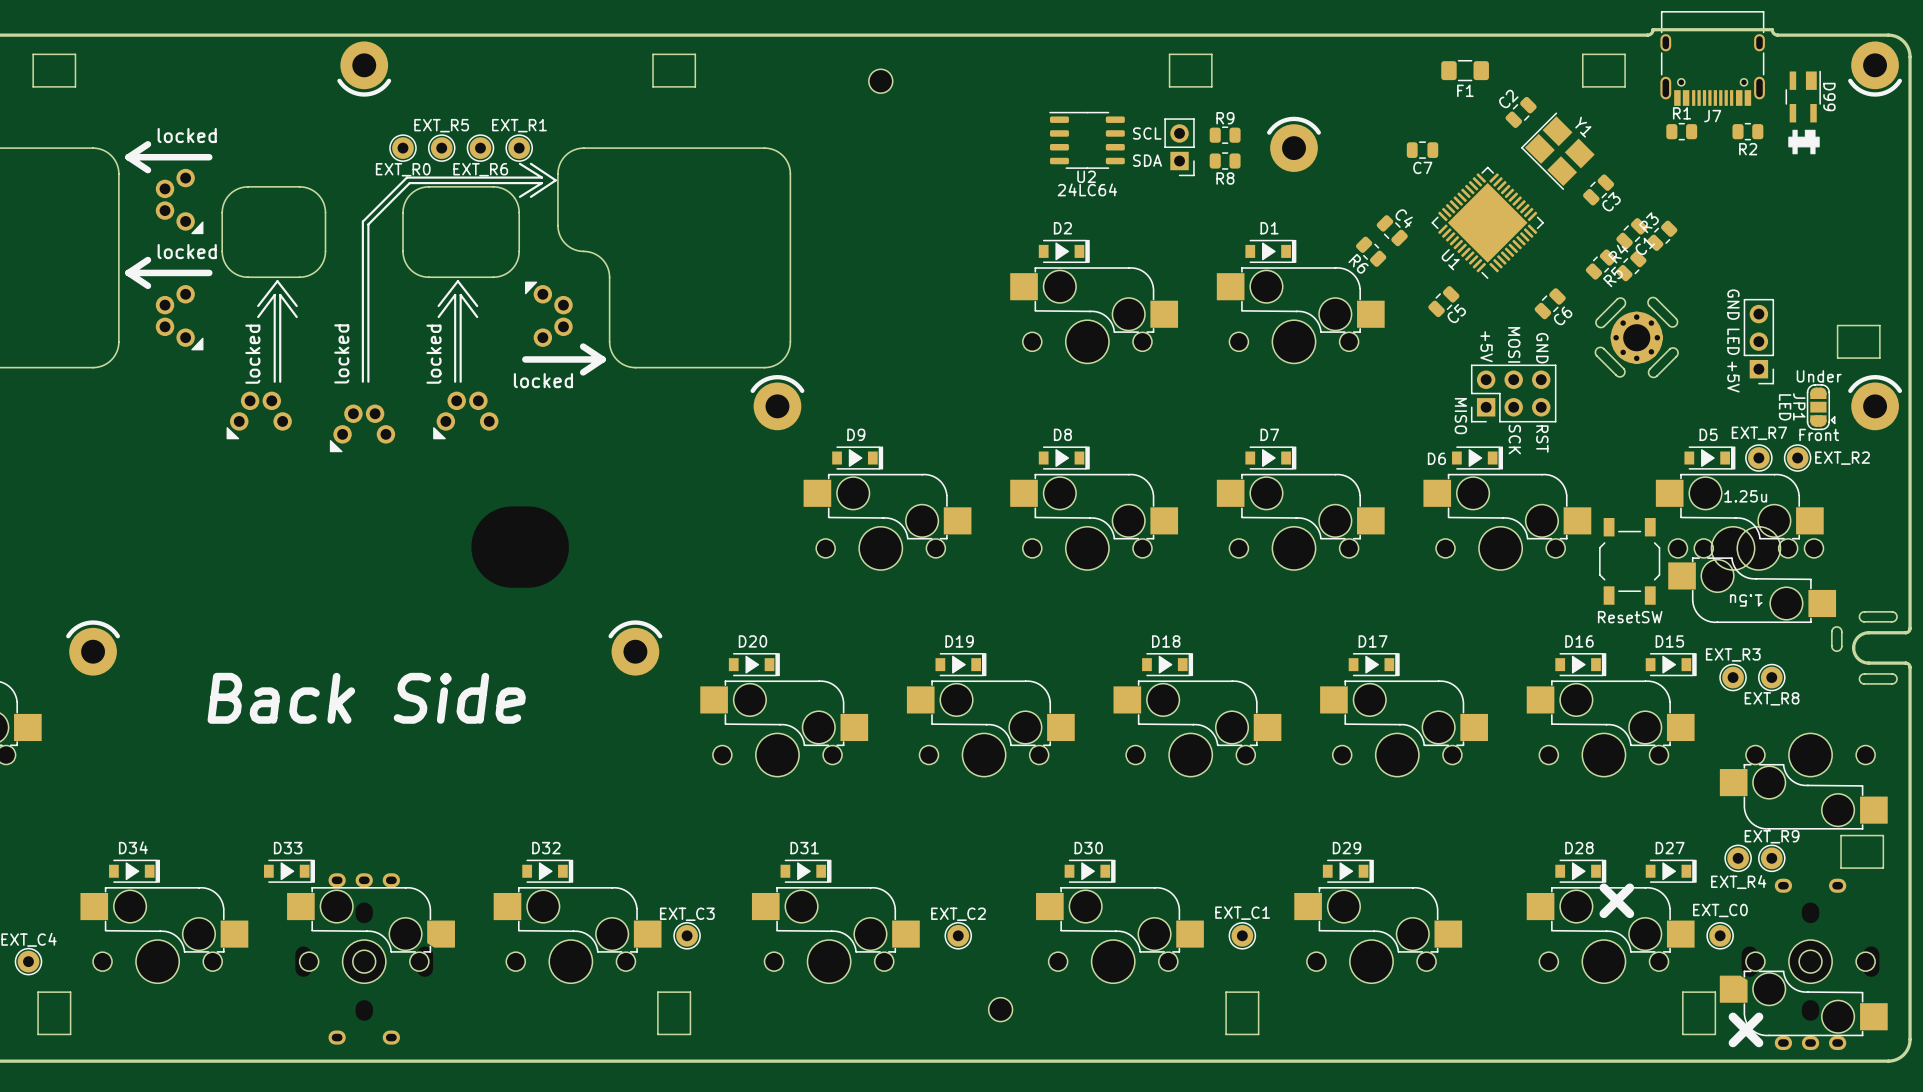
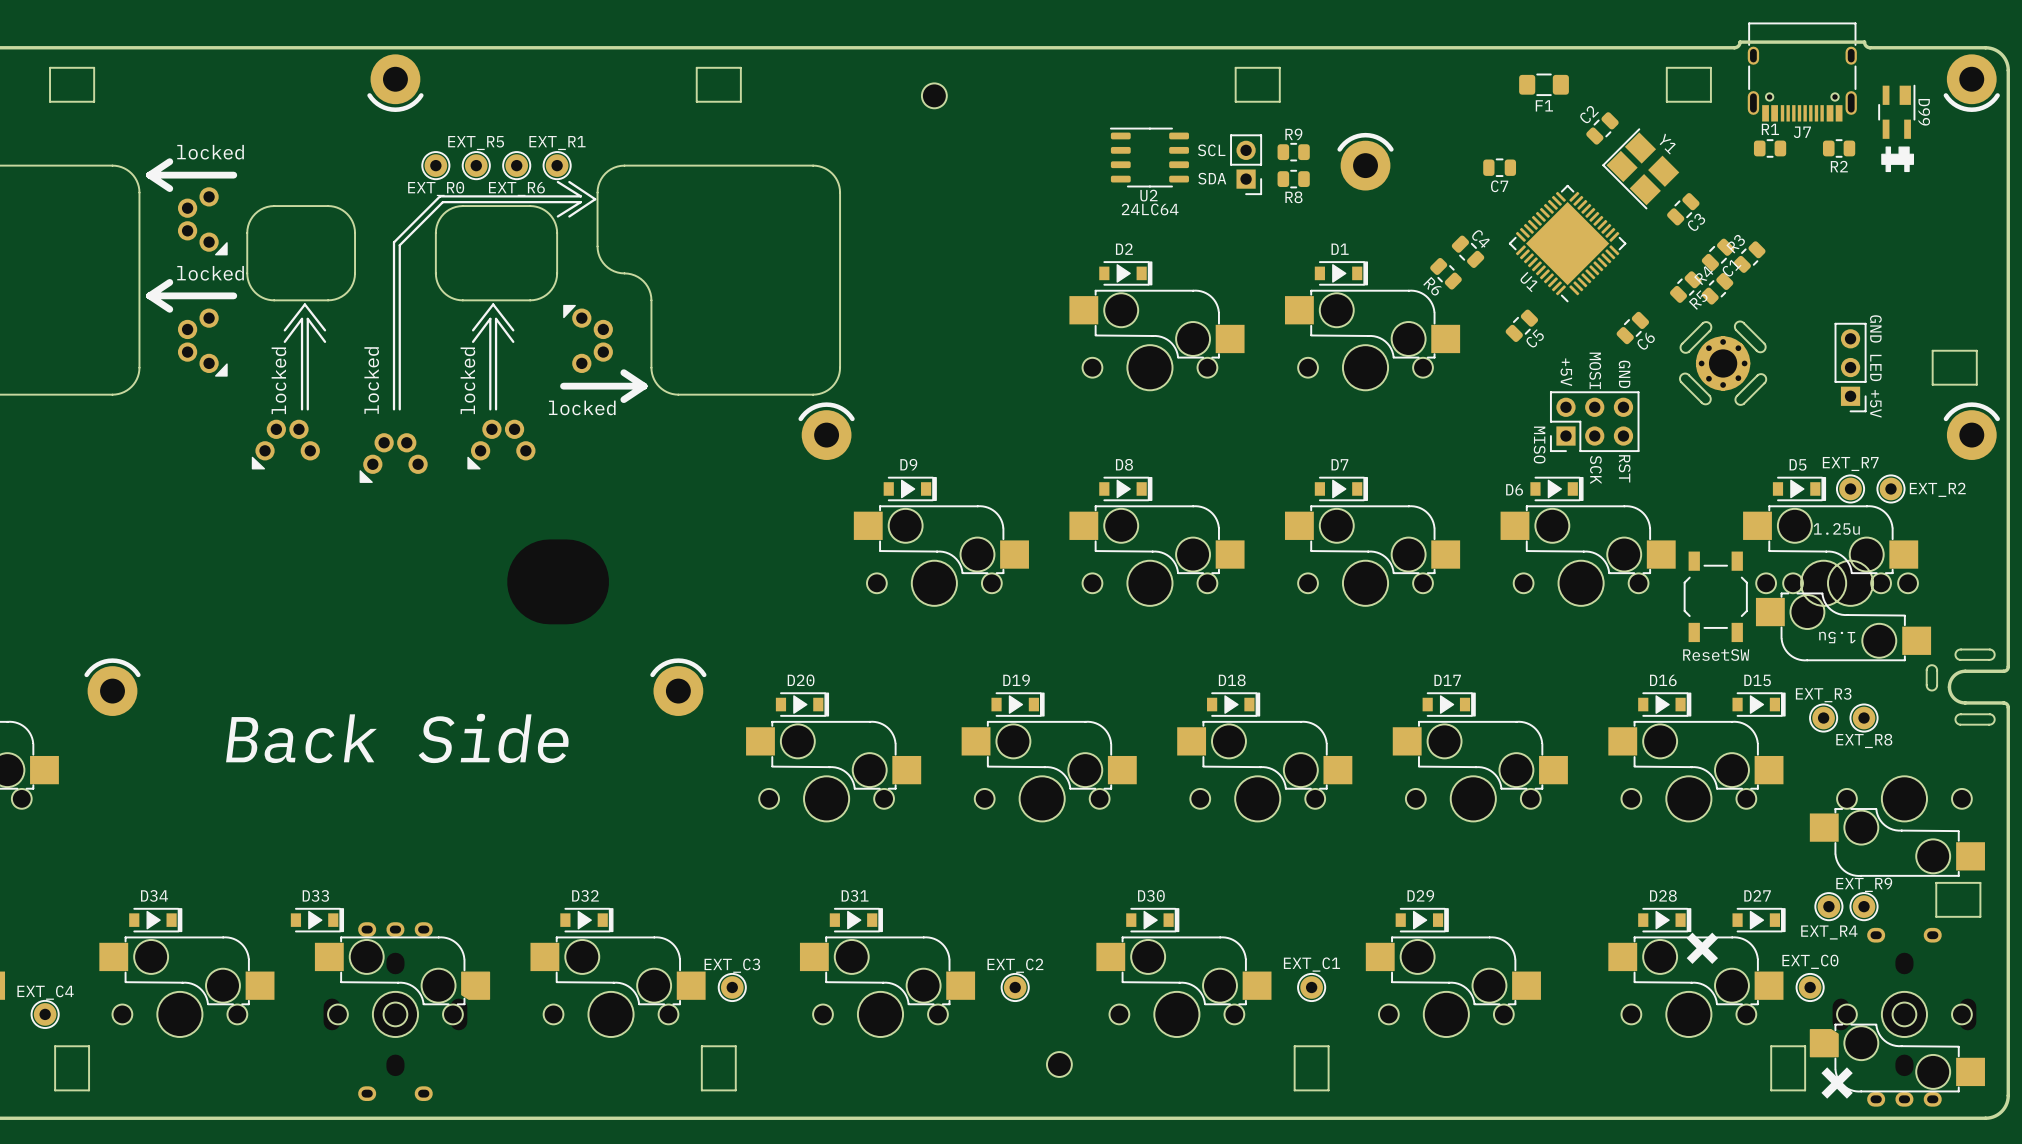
part text position: GND (1733, 304) -> GND (1875, 328)
part text position: LED (1733, 341) -> LED (1875, 367)
part text position: +5V (1733, 377) -> +5V (1875, 403)
JP1: (1821, 407) -> none

